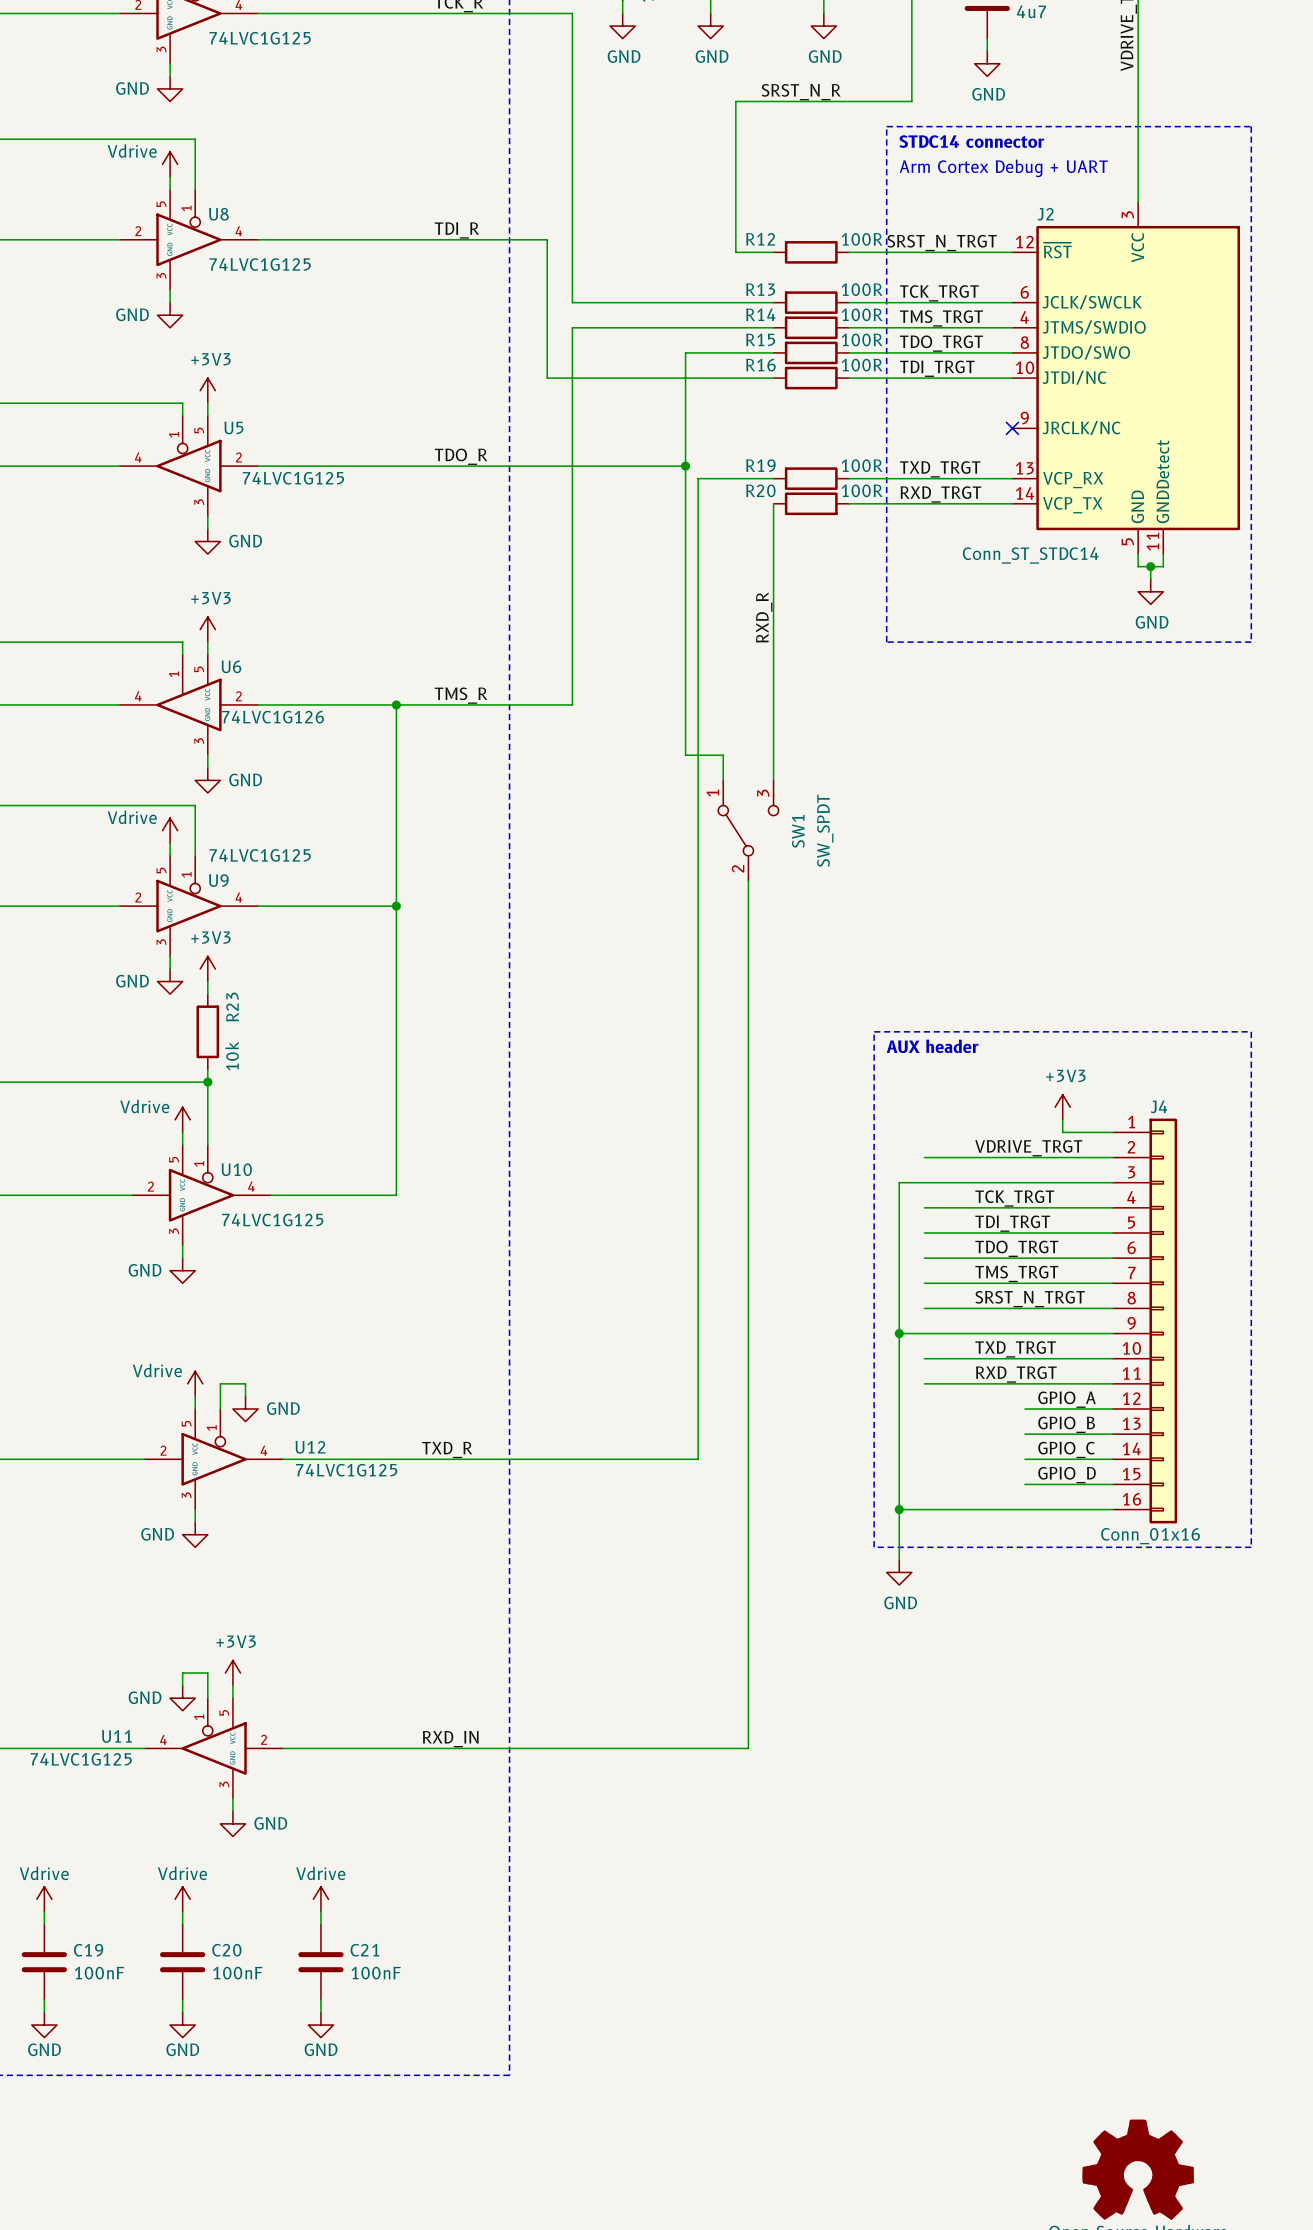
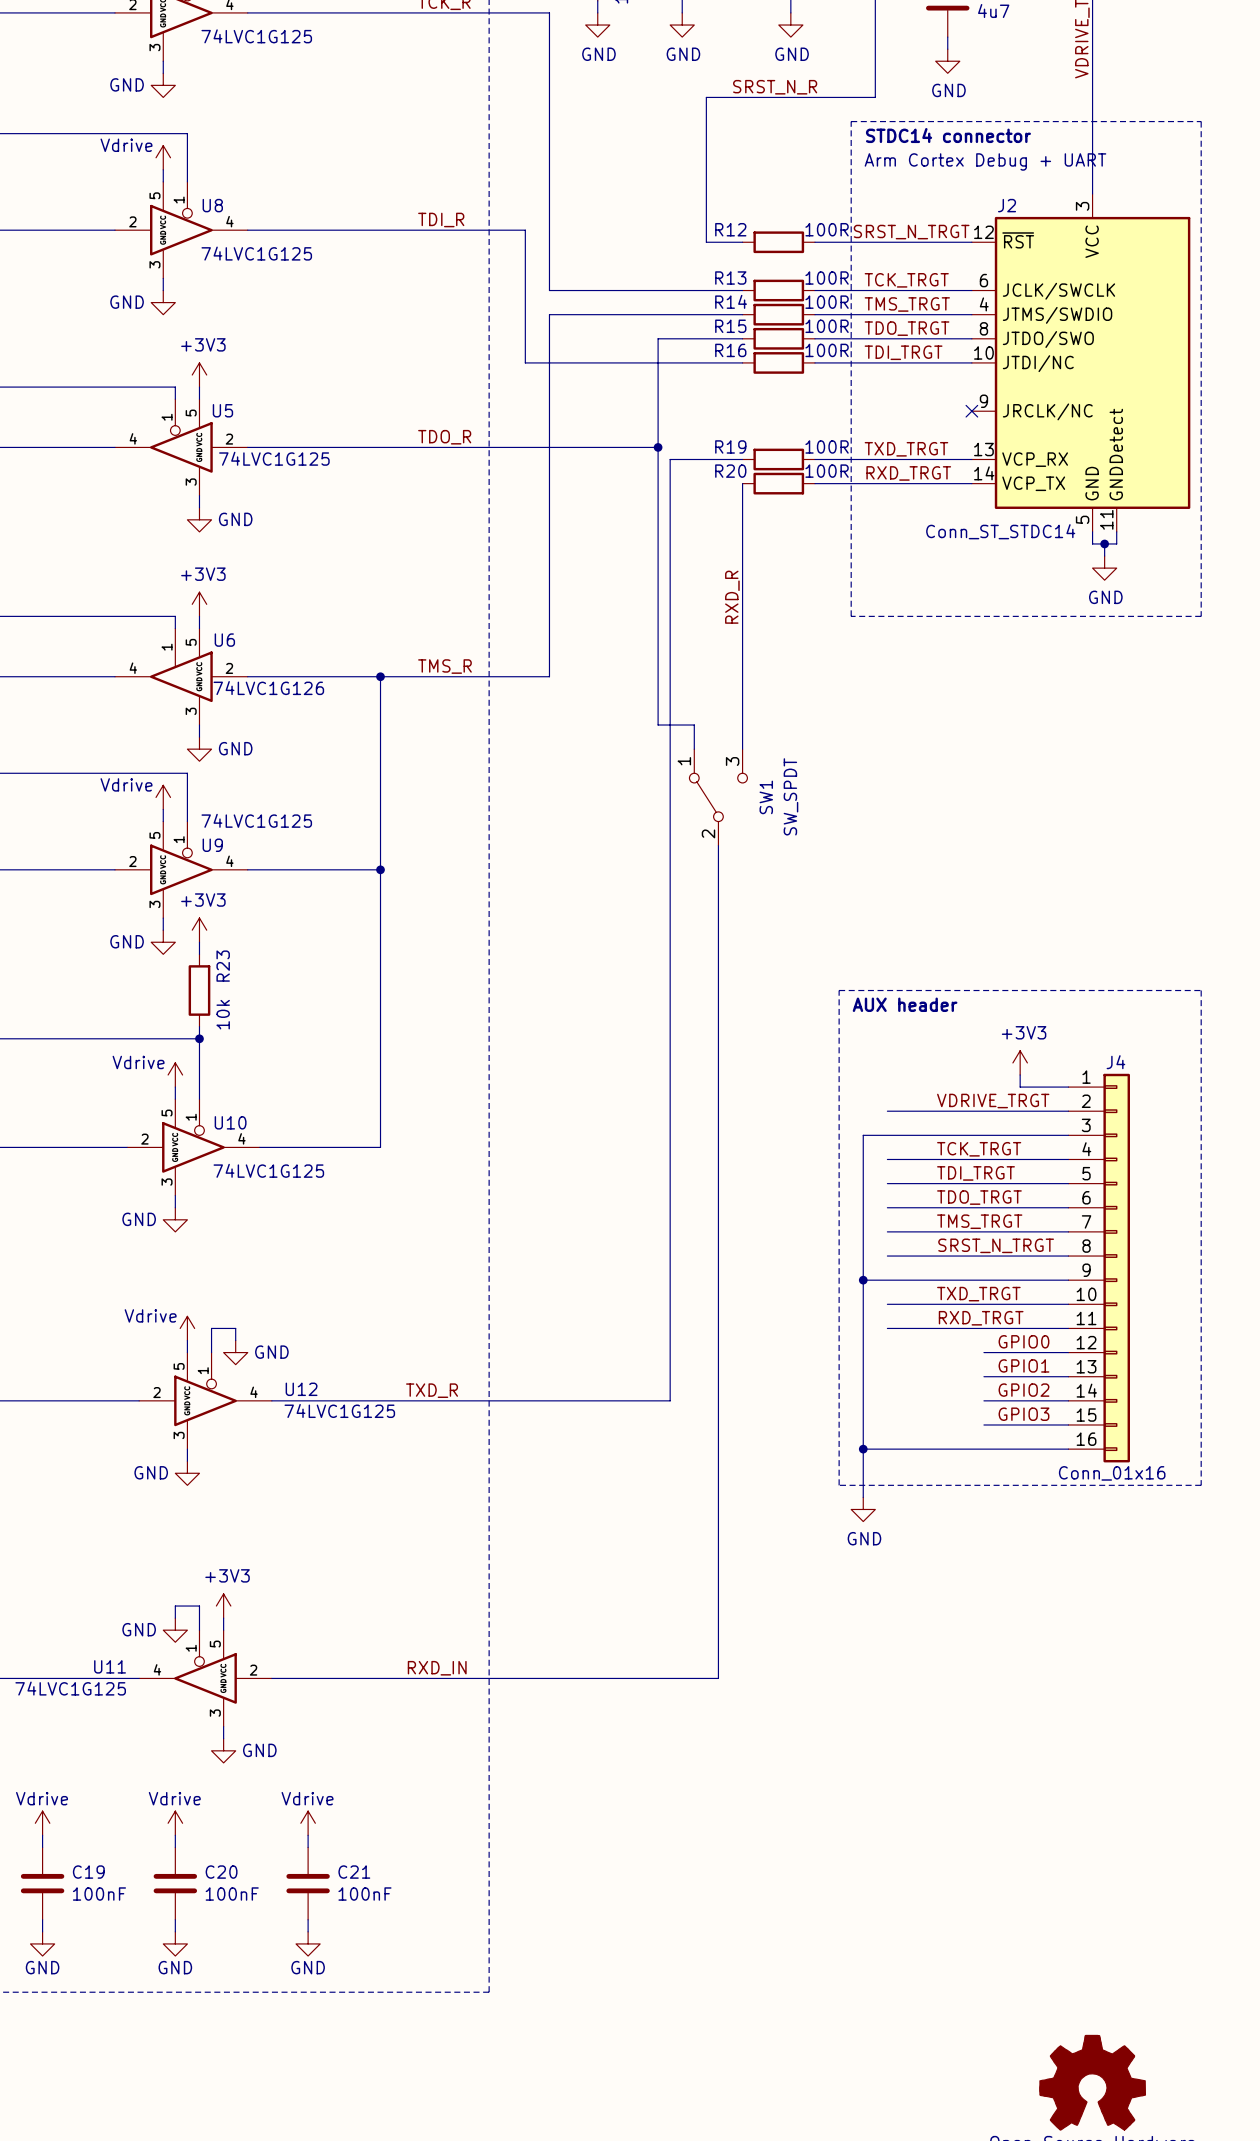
label: GPIO_A (1067, 1399) -> GPIO0 (1023, 1341)
label: GPIO_B (1066, 1424) -> GPIO1 (1023, 1365)
label: GPIO_C (1066, 1449) -> GPIO2 (1023, 1390)
label: GPIO_D (1067, 1475) -> GPIO3 (1023, 1414)

